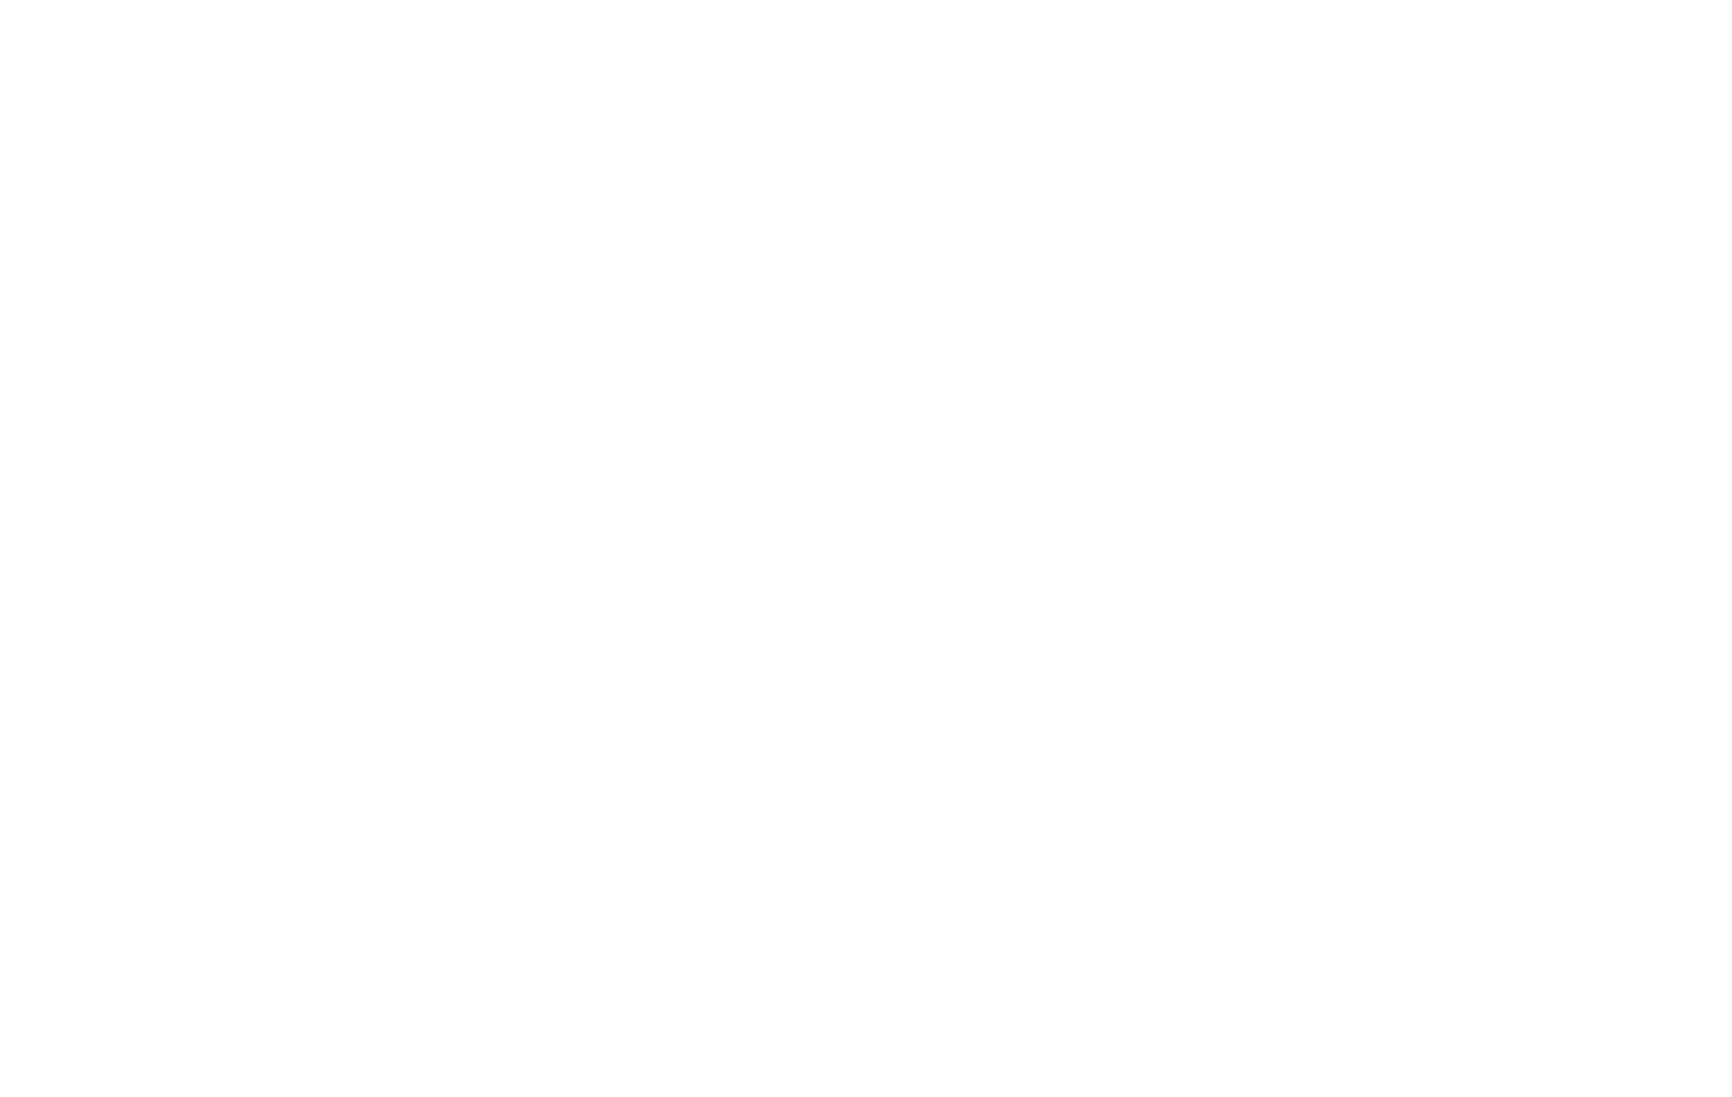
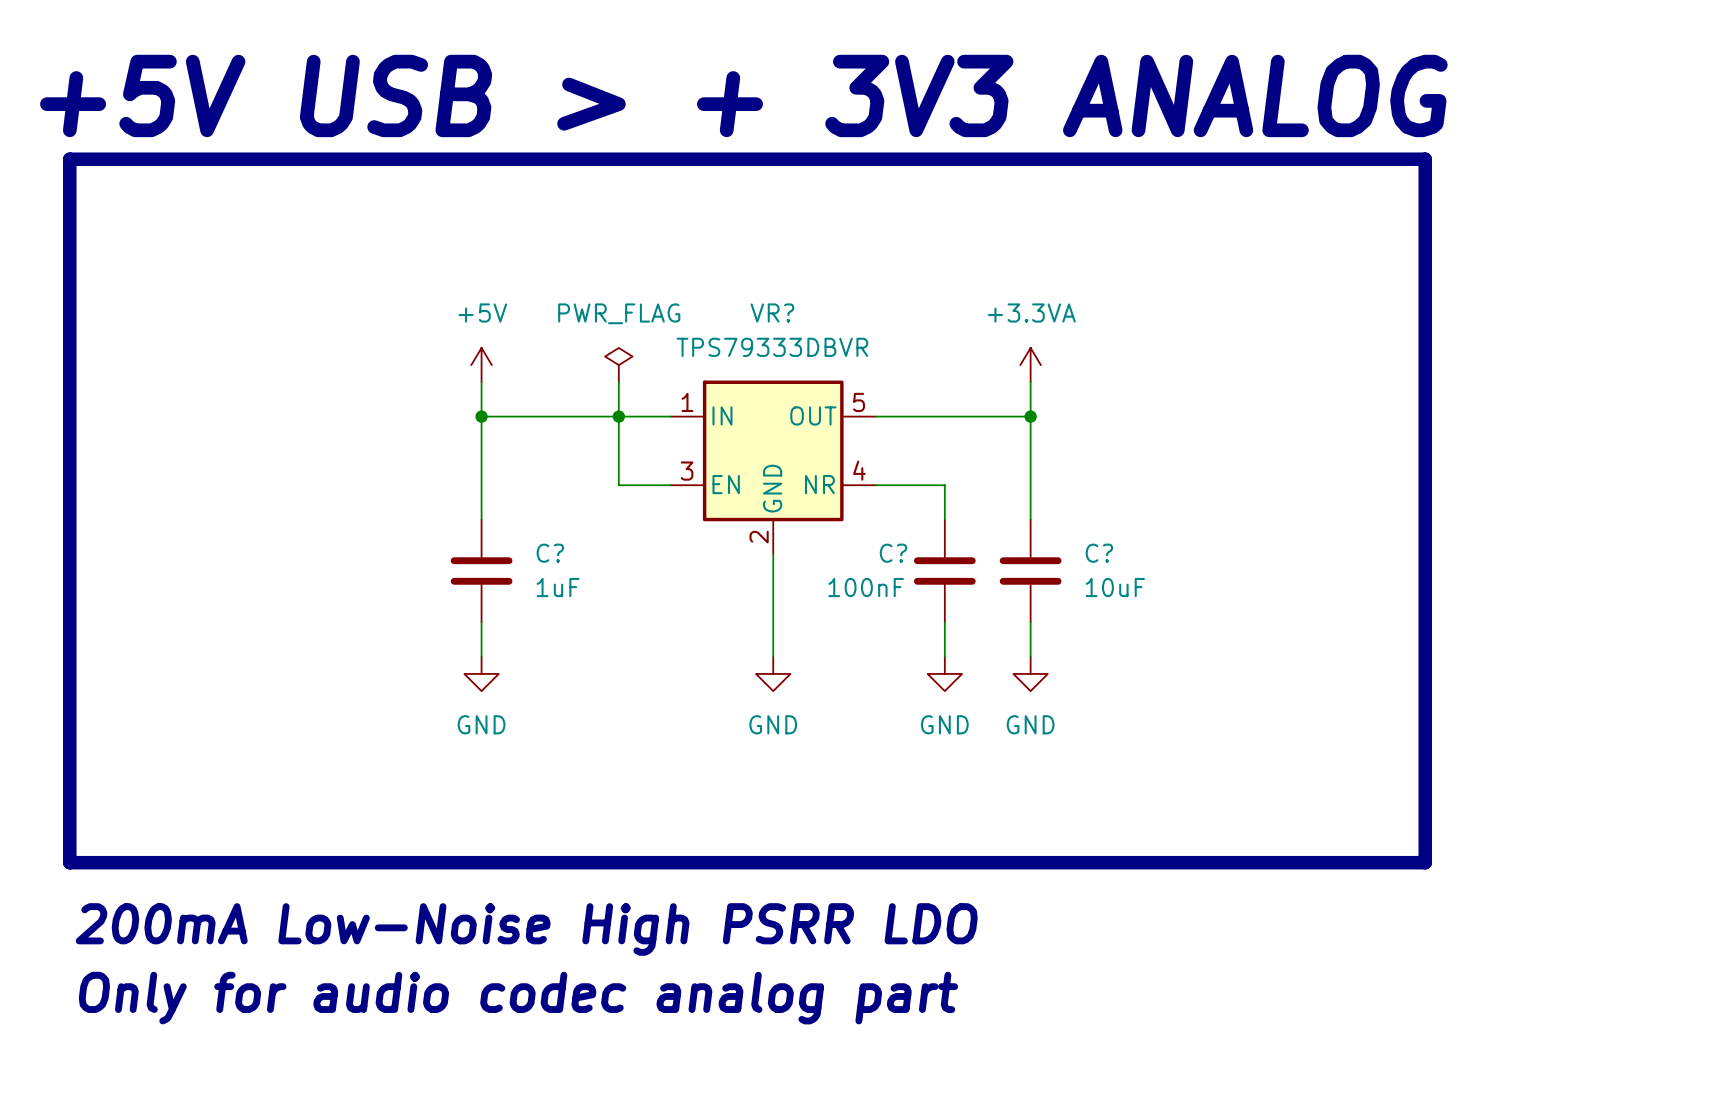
text: none -> +5V USB > + 3V3 ANALOG (743, 95)
line: none -> (69, 159) (1425, 159) (1425, 862) (69, 862) (69, 159)
power symbol: none -> +5V (481, 365)
power symbol: none -> PWR_FLAG (618, 365)
power symbol: none -> +3.3VA (1030, 365)
wire: none -> (481, 382) (481, 519)
wire: none -> (618, 382) (618, 485) (670, 485)
wire: none -> (1030, 382) (1030, 519)
wire: none -> (481, 416) (670, 416)
junction: none -> (481, 416)
junction: none -> (618, 416)
wire: none -> (876, 416) (1030, 416)
junction: none -> (1030, 416)
VR?: none -> TPS79333DBVR (773, 467)
wire: none -> (876, 485) (944, 485) (944, 519)
wire: none -> (773, 553) (773, 656)
C?: none -> 1uF (481, 571)
C?: none -> 100nF (944, 571)
C?: none -> 10uF (1030, 571)
wire: none -> (481, 622) (481, 656)
wire: none -> (944, 622) (944, 656)
wire: none -> (1030, 622) (1030, 656)
power symbol: none -> GND (481, 673)
power symbol: none -> GND (773, 673)
power symbol: none -> GND (944, 673)
power symbol: none -> GND (1030, 673)
text: none -> 200mA Low-Noise High PSRR LDO (526, 929)
text: none -> Only for audio codec analog part (518, 998)

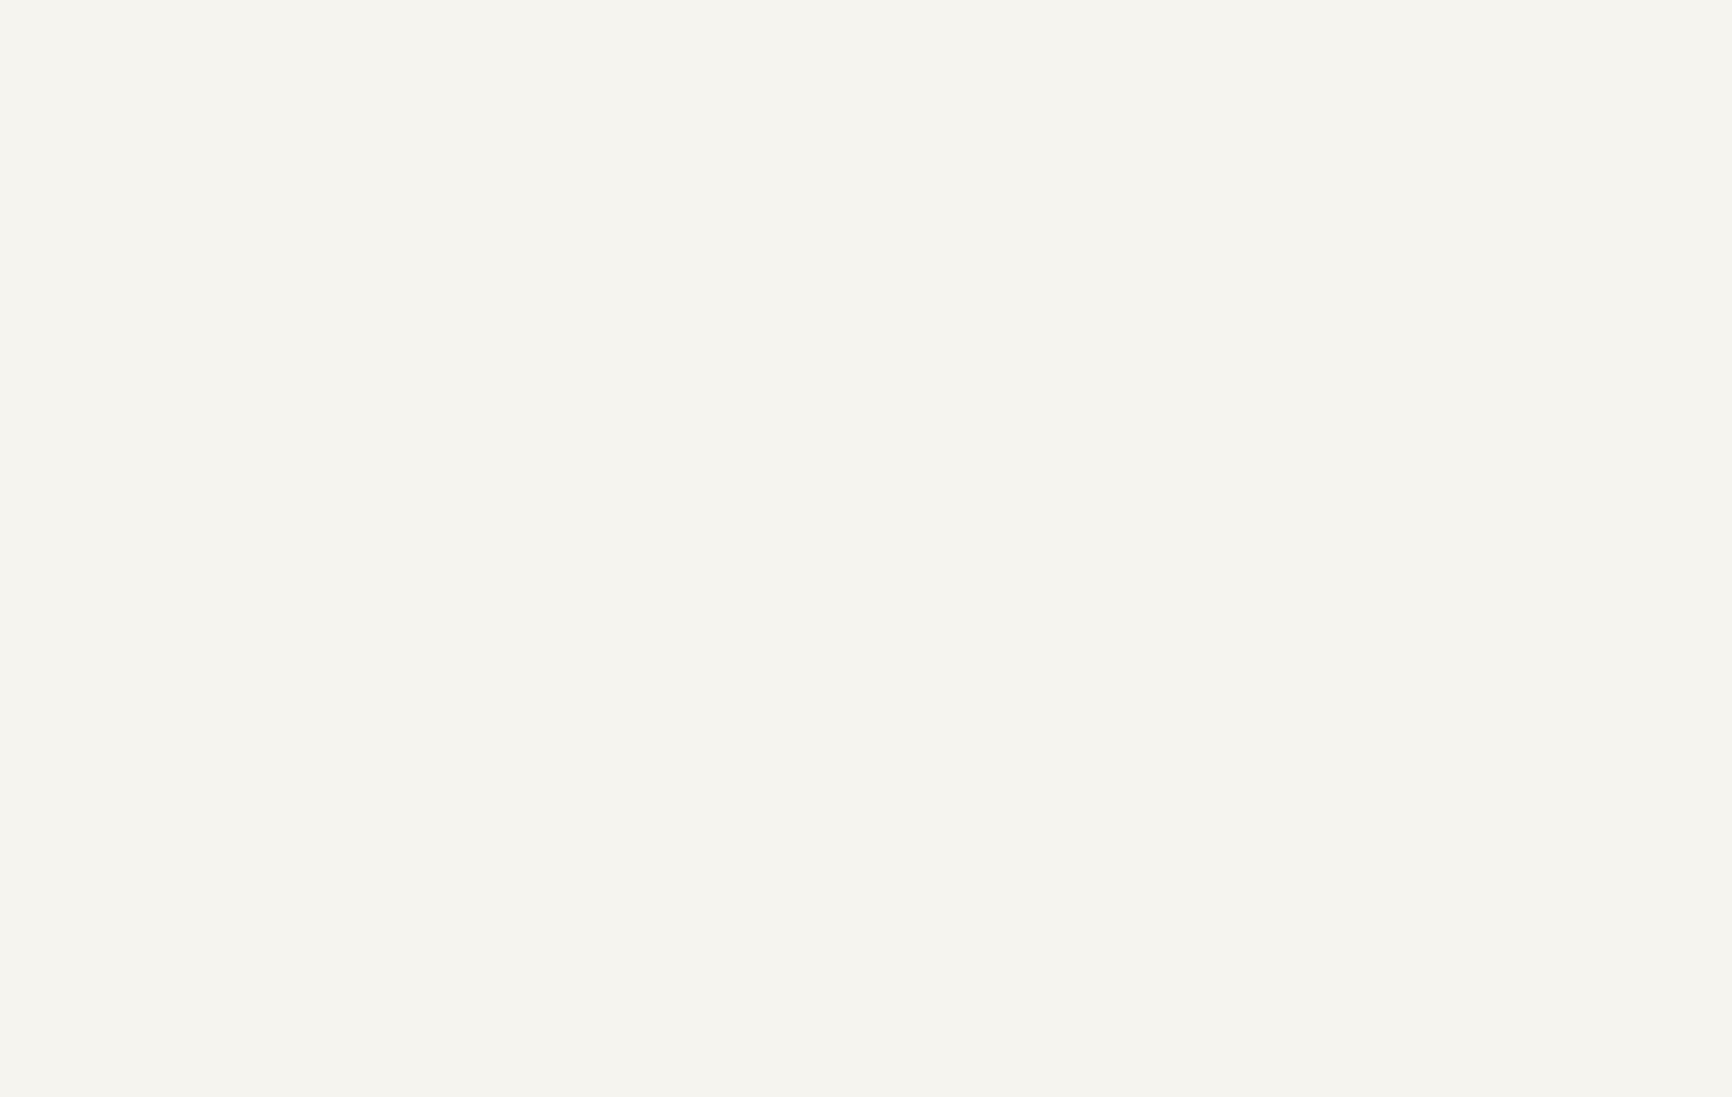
text: +5V USB > + 3V3 ANALOG (743, 95) -> none
line: (69, 159) (1425, 159) (1425, 862) (69, 862) (69, 159) -> none
power symbol: +5V (481, 365) -> none
power symbol: PWR_FLAG (618, 365) -> none
power symbol: +3.3VA (1030, 365) -> none
wire: (481, 382) (481, 519) -> none
wire: (618, 382) (618, 485) (670, 485) -> none
wire: (1030, 382) (1030, 519) -> none
wire: (481, 416) (670, 416) -> none
junction: (481, 416) -> none
junction: (618, 416) -> none
wire: (876, 416) (1030, 416) -> none
junction: (1030, 416) -> none
VR?: TPS79333DBVR (773, 467) -> none
wire: (876, 485) (944, 485) (944, 519) -> none
wire: (773, 553) (773, 656) -> none
C?: 1uF (481, 571) -> none
C?: 100nF (944, 571) -> none
C?: 10uF (1030, 571) -> none
wire: (481, 622) (481, 656) -> none
wire: (944, 622) (944, 656) -> none
wire: (1030, 622) (1030, 656) -> none
power symbol: GND (481, 673) -> none
power symbol: GND (773, 673) -> none
power symbol: GND (944, 673) -> none
power symbol: GND (1030, 673) -> none
text: 200mA Low-Noise High PSRR LDO (526, 929) -> none
text: Only for audio codec analog part (518, 998) -> none

